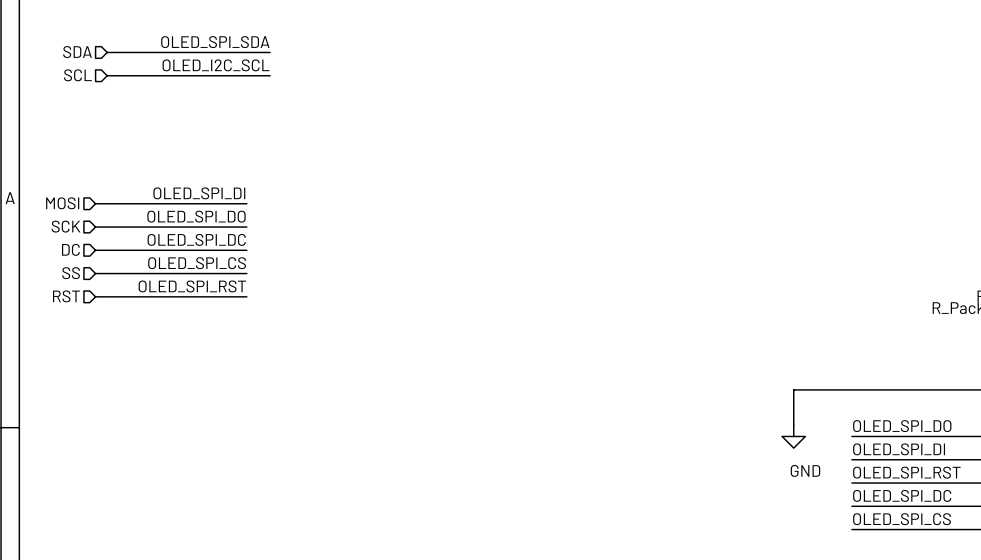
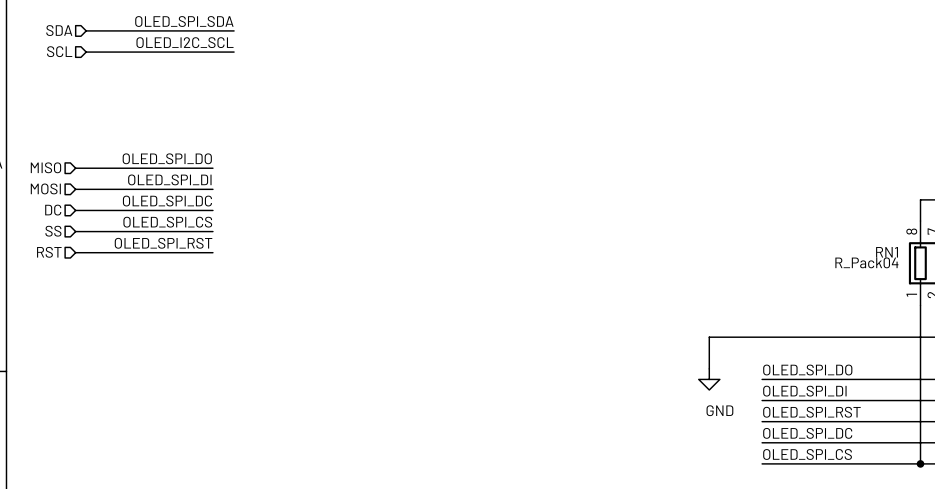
label: OLED_SPI_DI (199, 193) -> OLED_SPI_DO (167, 158)
hierarchical label: MOSI (62, 203) -> MISO (45, 167)
label: OLED_SPI_DO (196, 216) -> OLED_SPI_DI (169, 179)
hierarchical label: SCK (66, 226) -> MOSI (45, 188)

